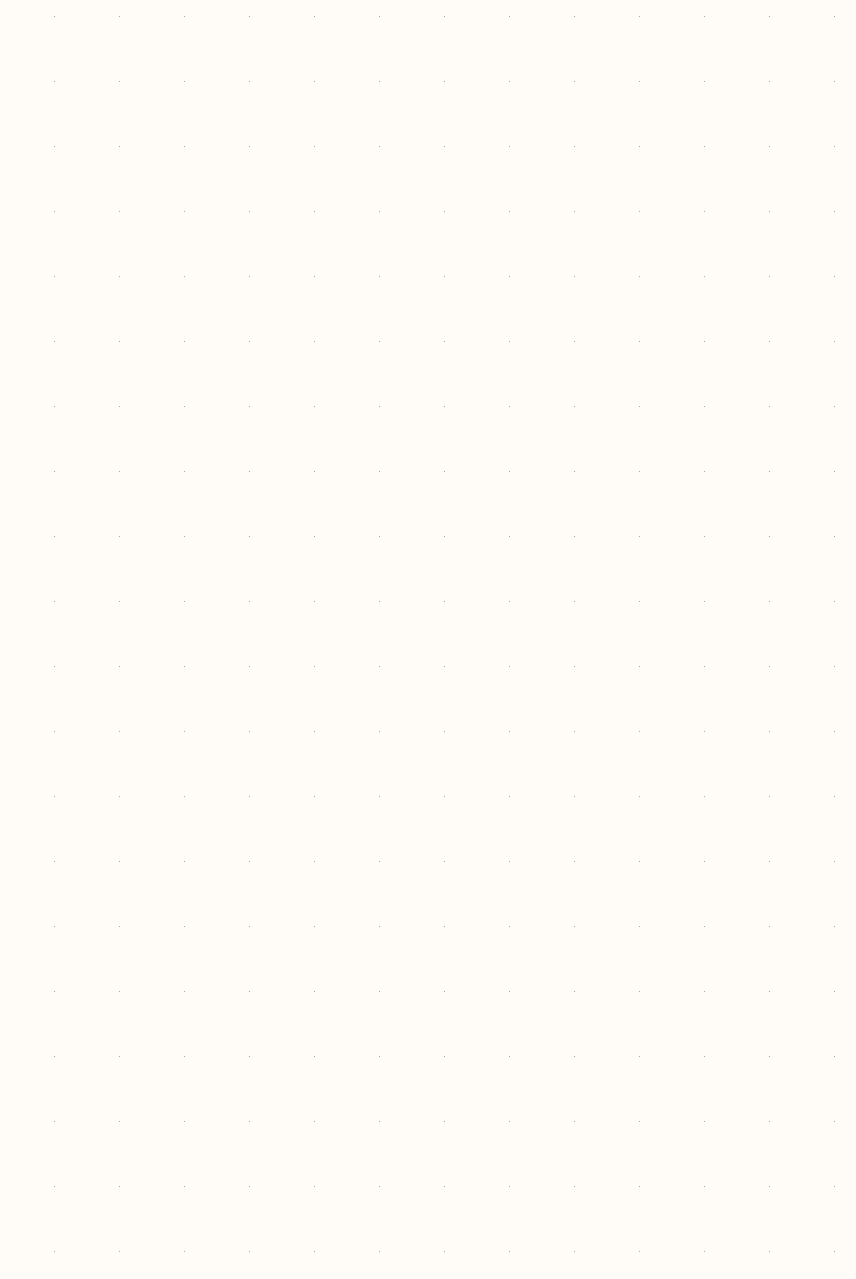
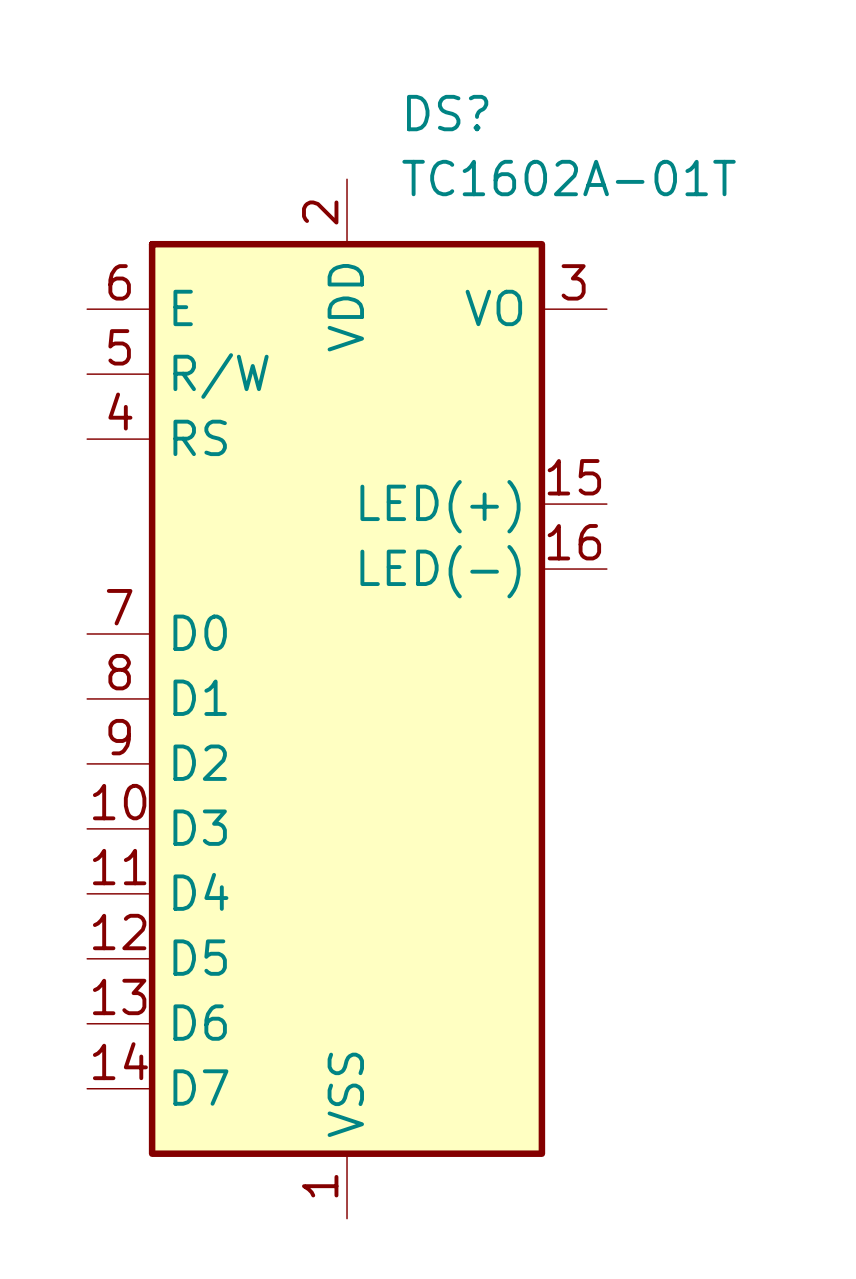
DS?: none -> TC1602A-01T (347, 698)

